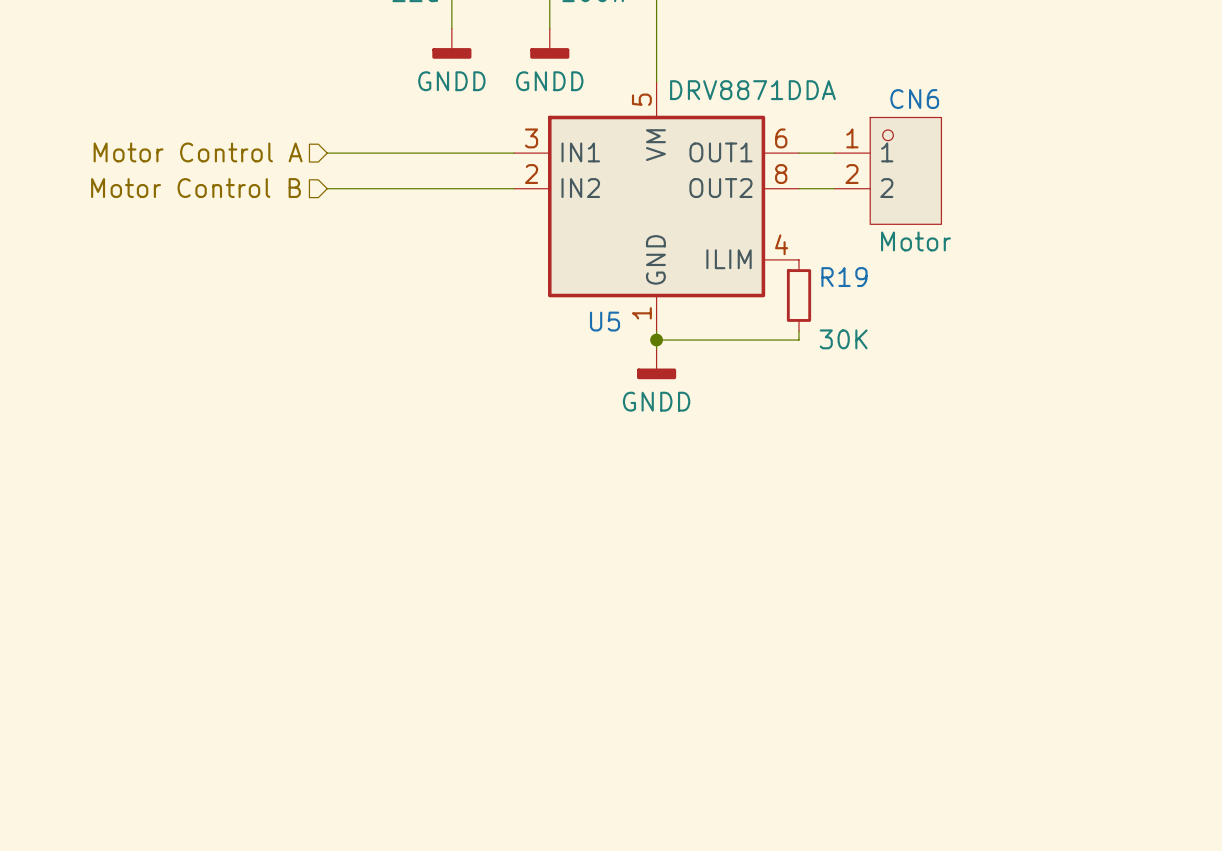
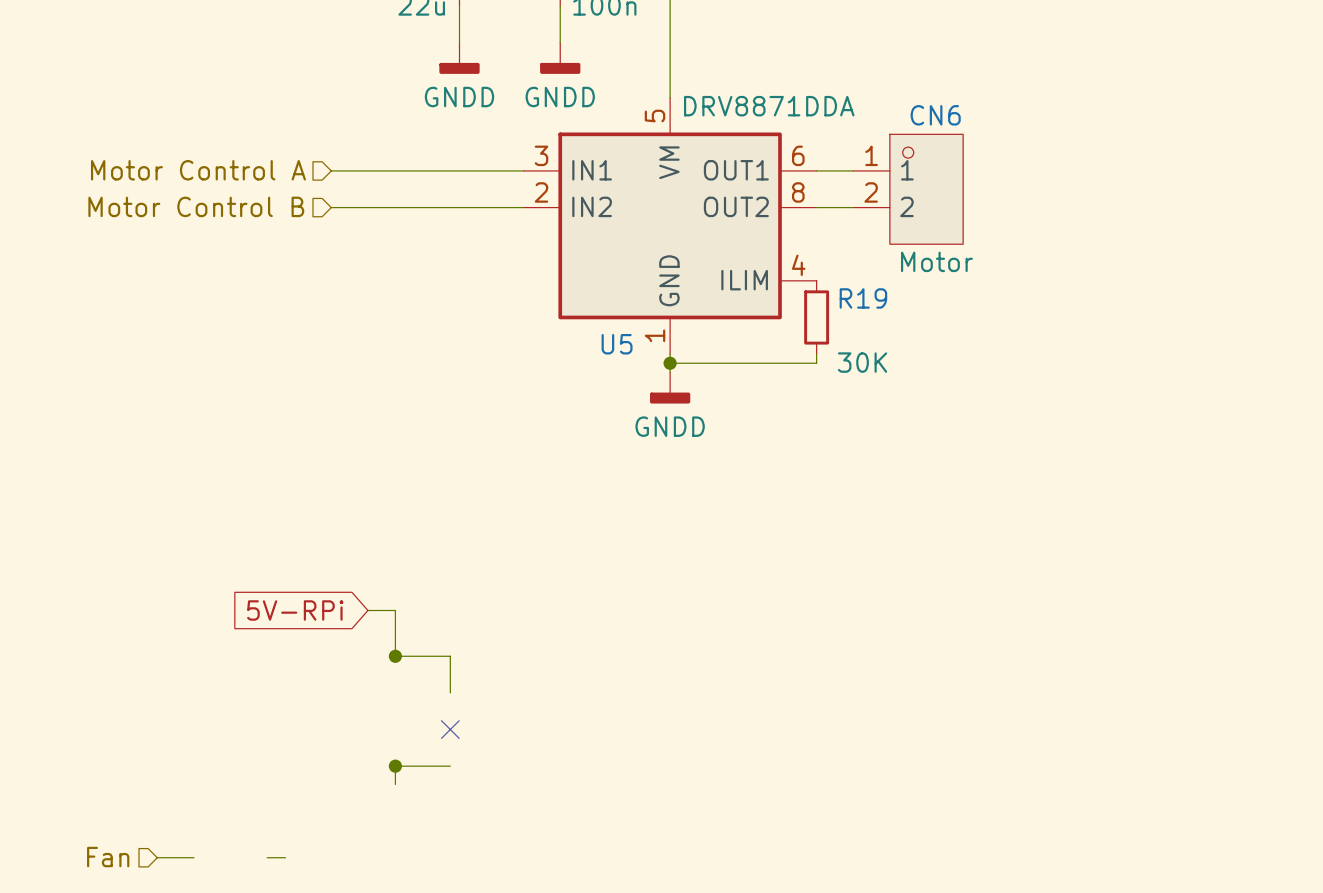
global label: none -> 5V-RPi (295, 610)
wire: none -> (367, 610) (395, 610) (395, 656) (450, 656) (450, 692)
junction: none -> (395, 656)
no-connect mark: none -> (450, 729)
junction: none -> (395, 766)
wire: none -> (450, 766) (395, 766) (395, 784)
hierarchical label: none -> Fan (108, 857)
wire: none -> (157, 857) (193, 857)
wire: none -> (267, 857) (285, 857)

